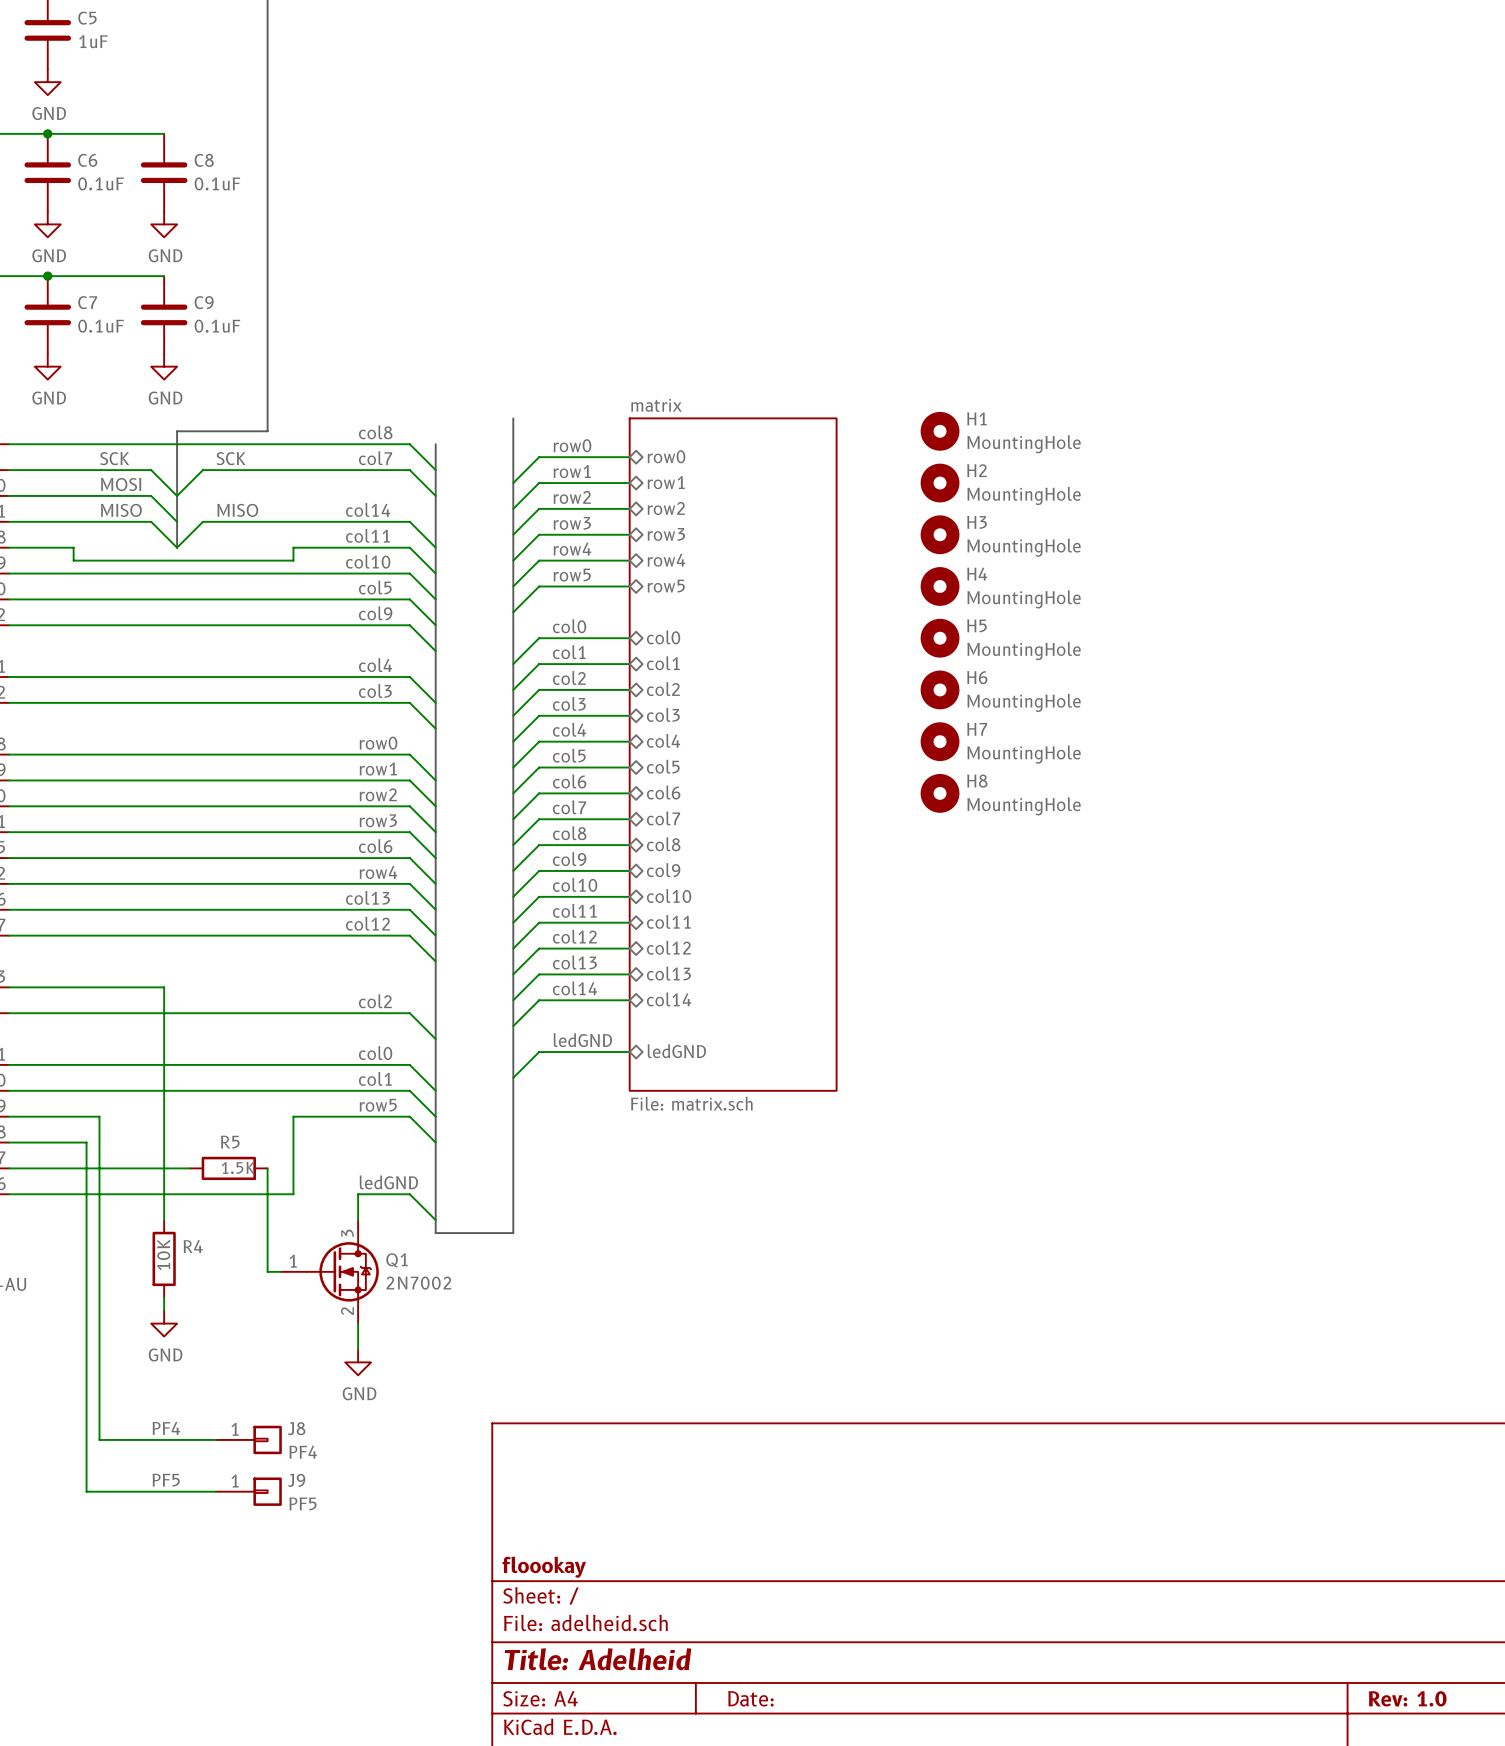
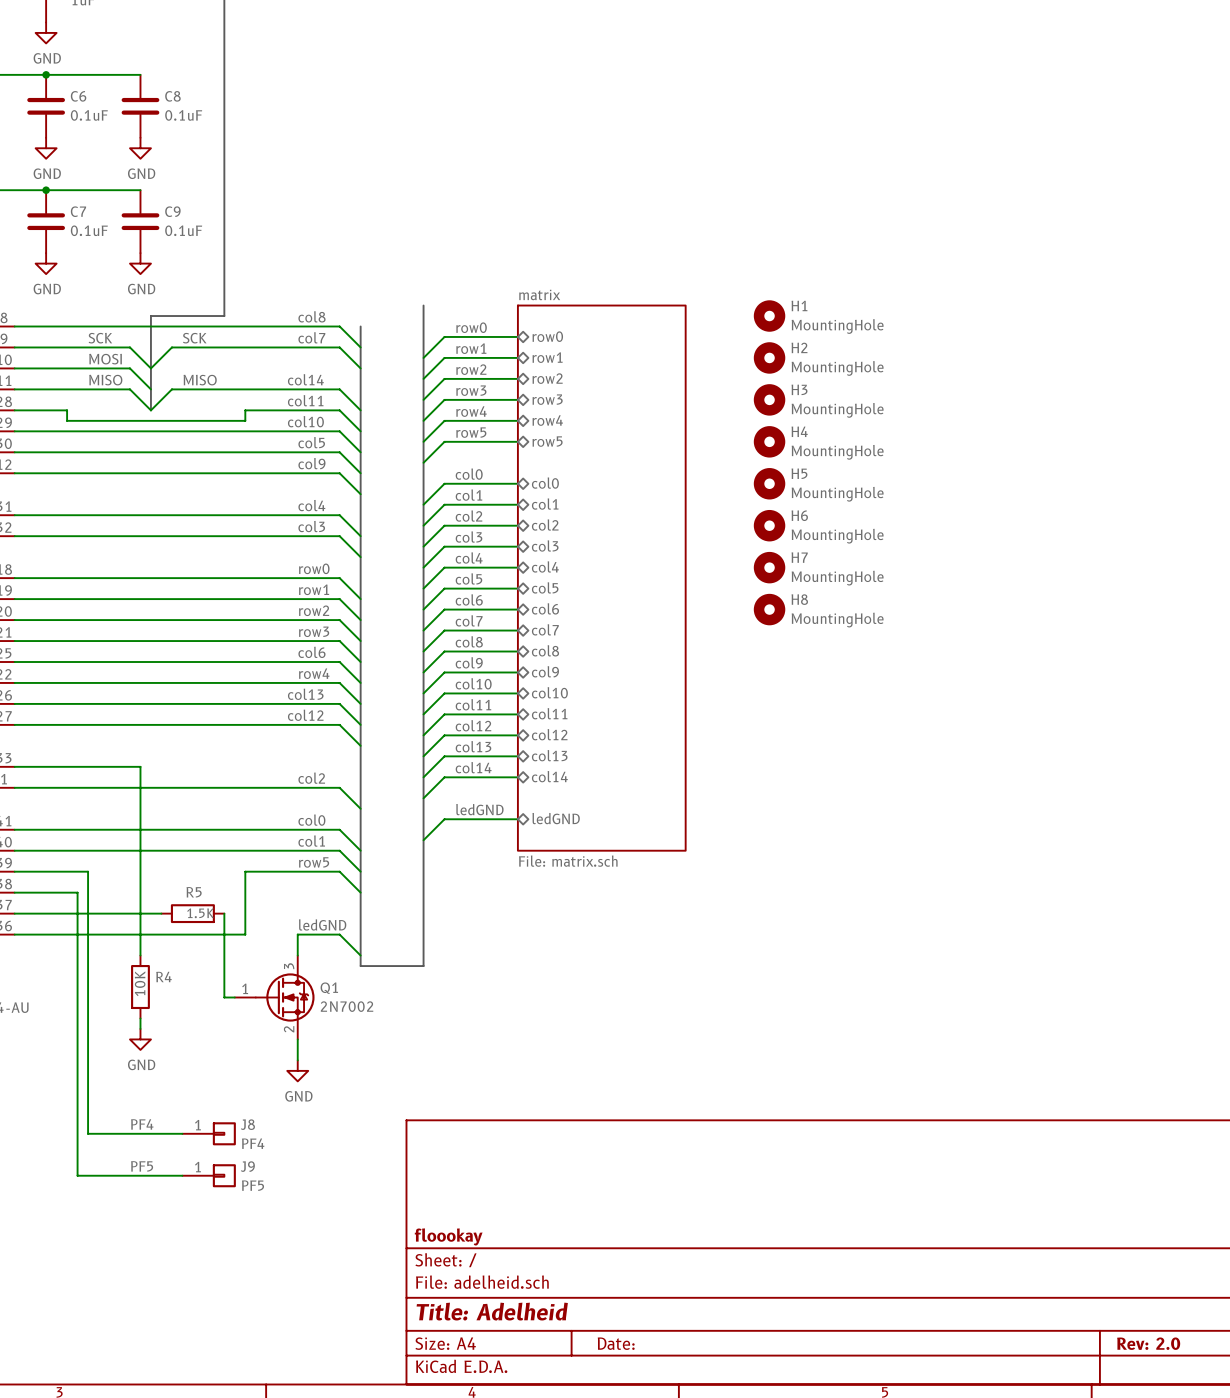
title block: Rev: 1.0 (1407, 1698) -> Rev: 2.0 (1148, 1343)

